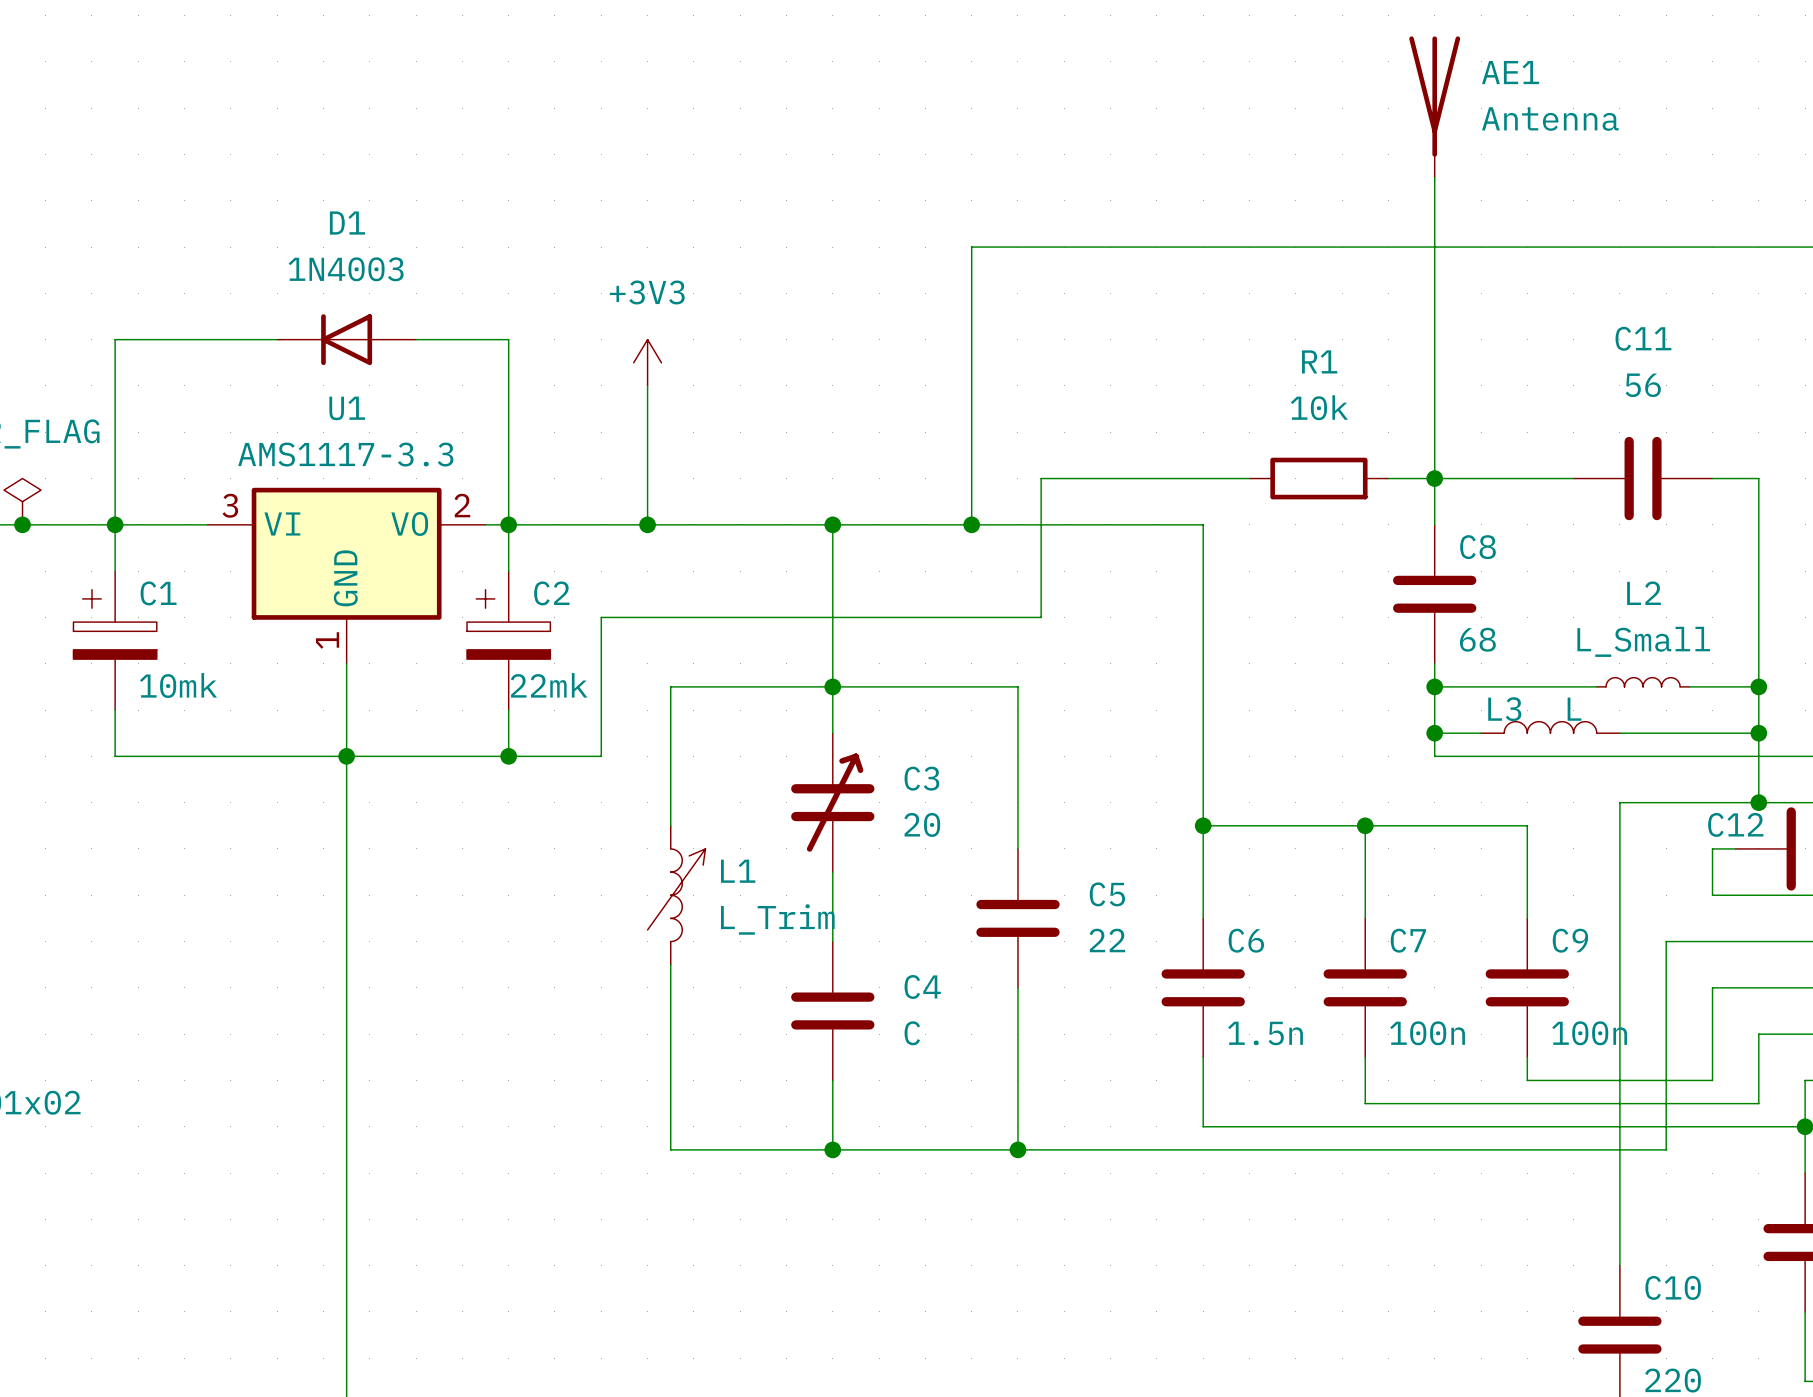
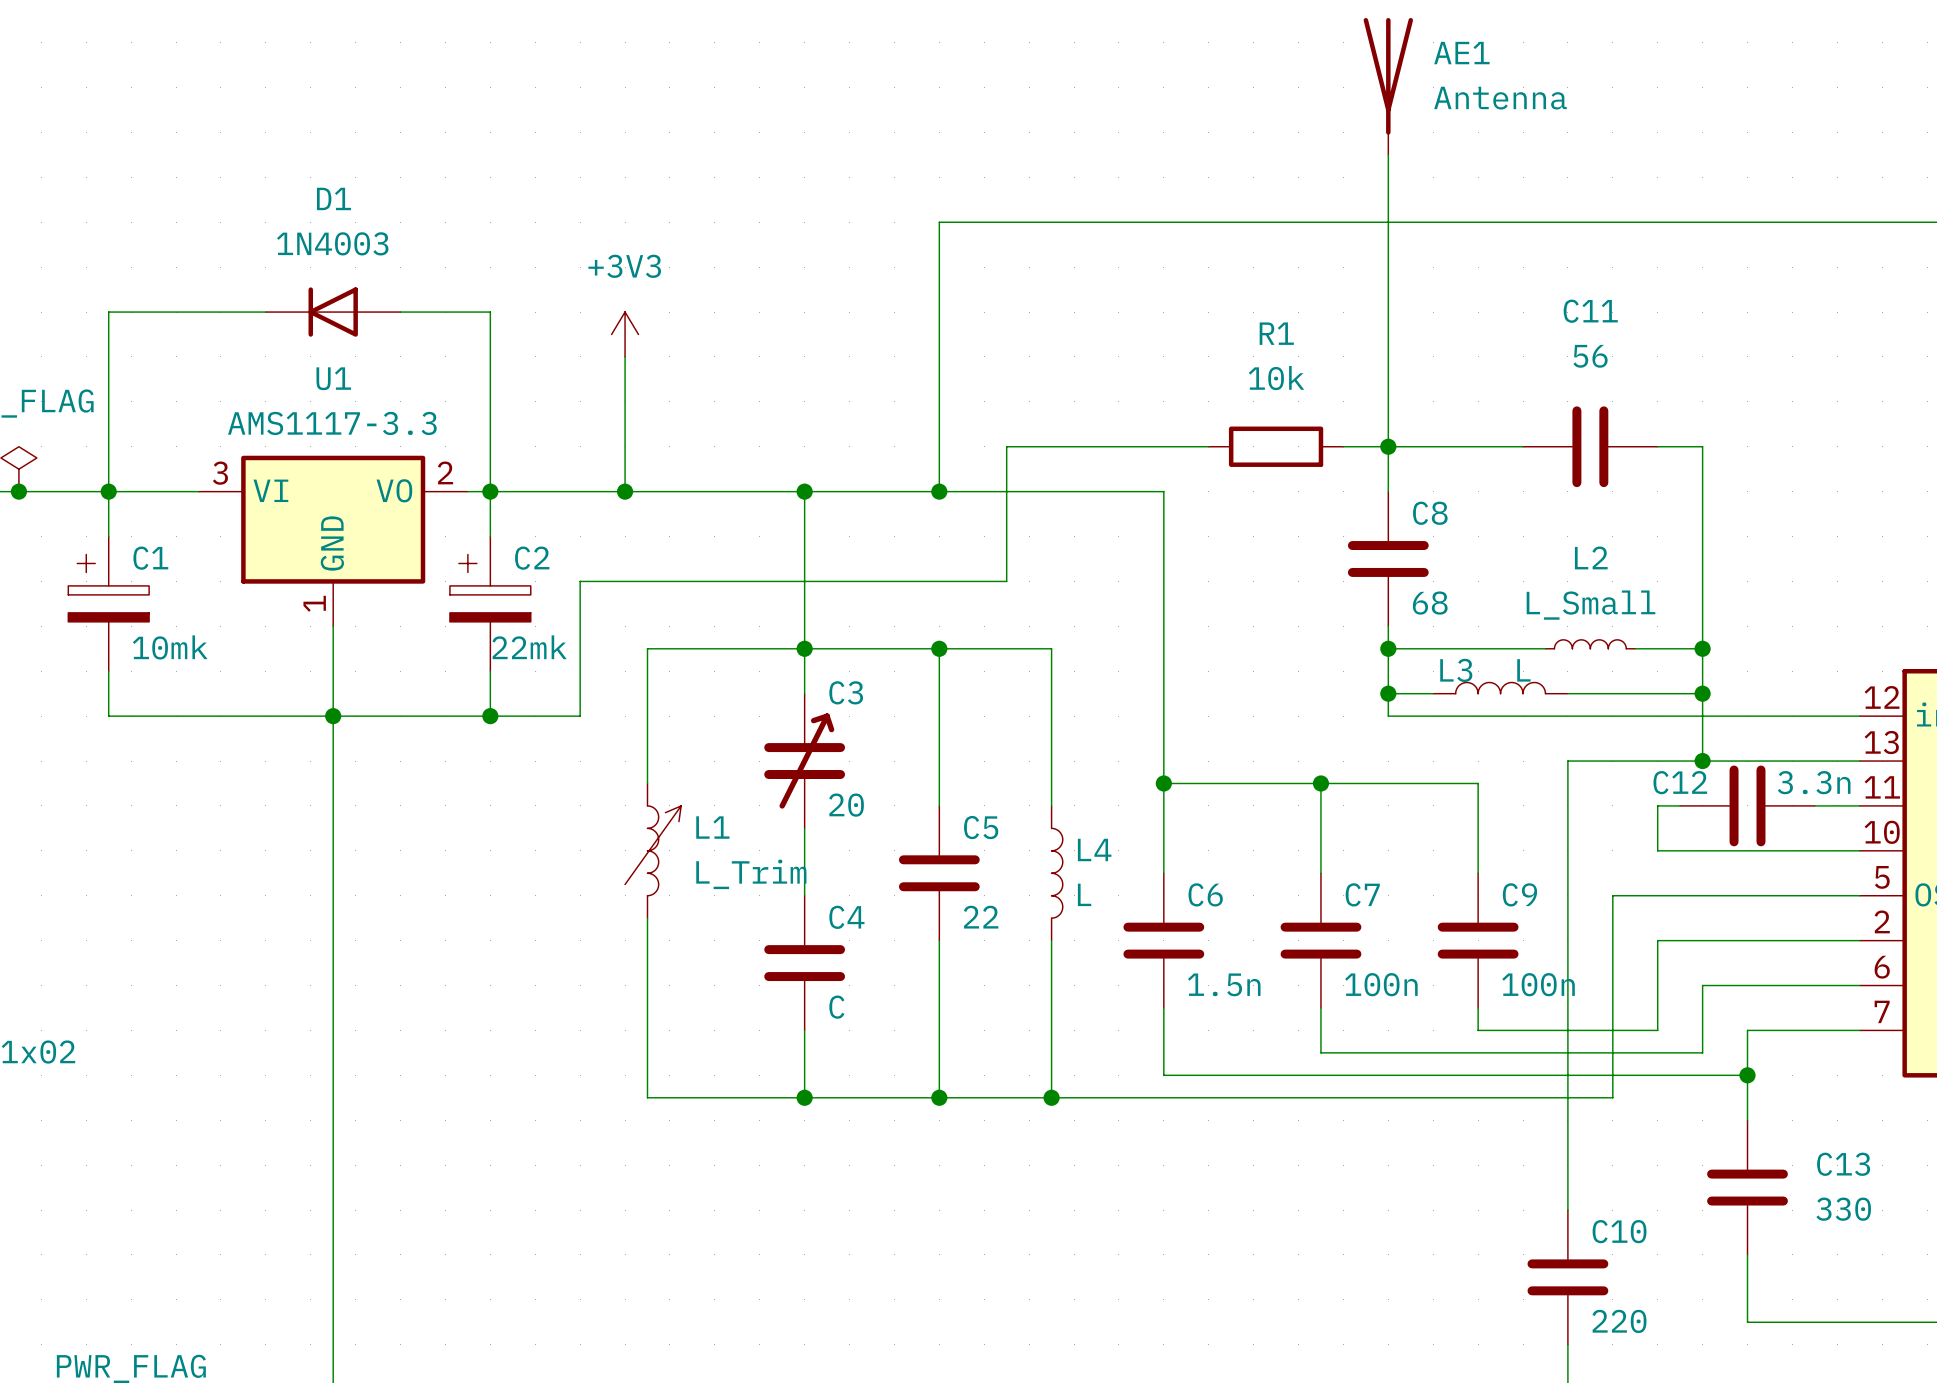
wire: none -> (939, 648) (939, 805)
junction: none -> (939, 648)
wire: (1017, 686) (1017, 848) -> (984, 648) (1051, 648) (1051, 805)
C3 name position: C3 (921, 778) -> C3 (846, 692)
C3 value position: 20 (922, 824) -> 20 (846, 805)
C5 name position: C5 (1107, 894) -> C5 (981, 827)
C5 position: (1017, 918) -> (939, 873)
L4: none -> L (1057, 873)
C5 value position: 22 (1107, 940) -> 22 (981, 917)
C4 name position: C4 (922, 986) -> C4 (846, 917)
wire: (1017, 987) (1017, 1149) -> (939, 940) (939, 1097)
wire: none -> (1051, 940) (1051, 1097)
C4 value position: C (912, 1033) -> C (836, 1007)
junction: none -> (939, 1097)
junction: (1017, 1149) -> none
junction: none -> (1051, 1097)

